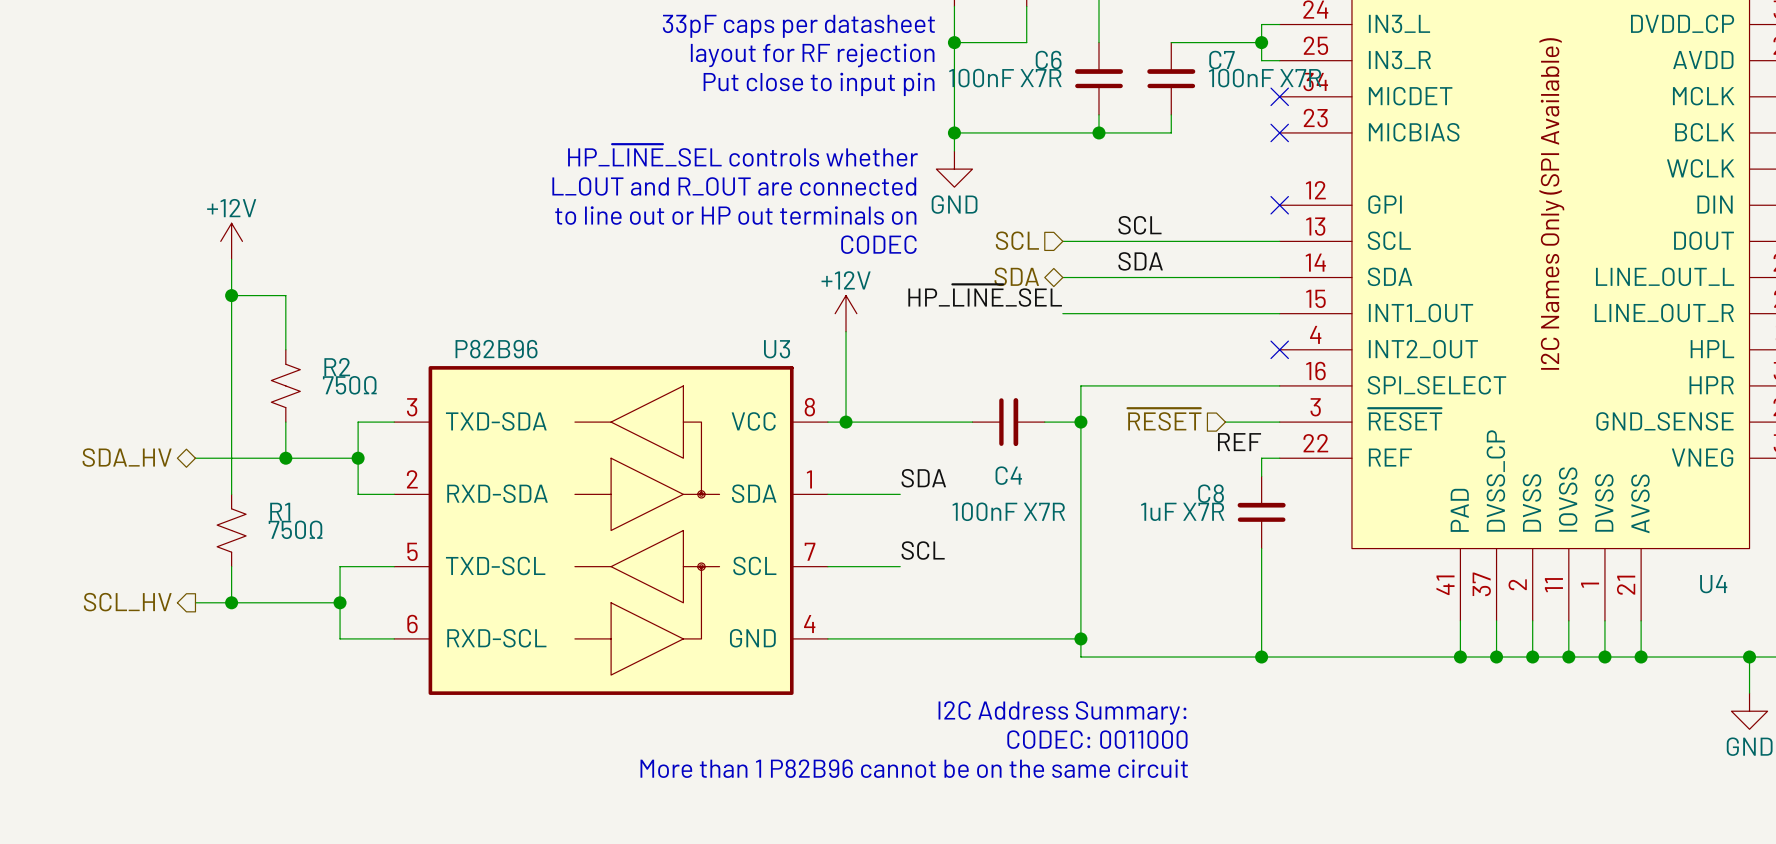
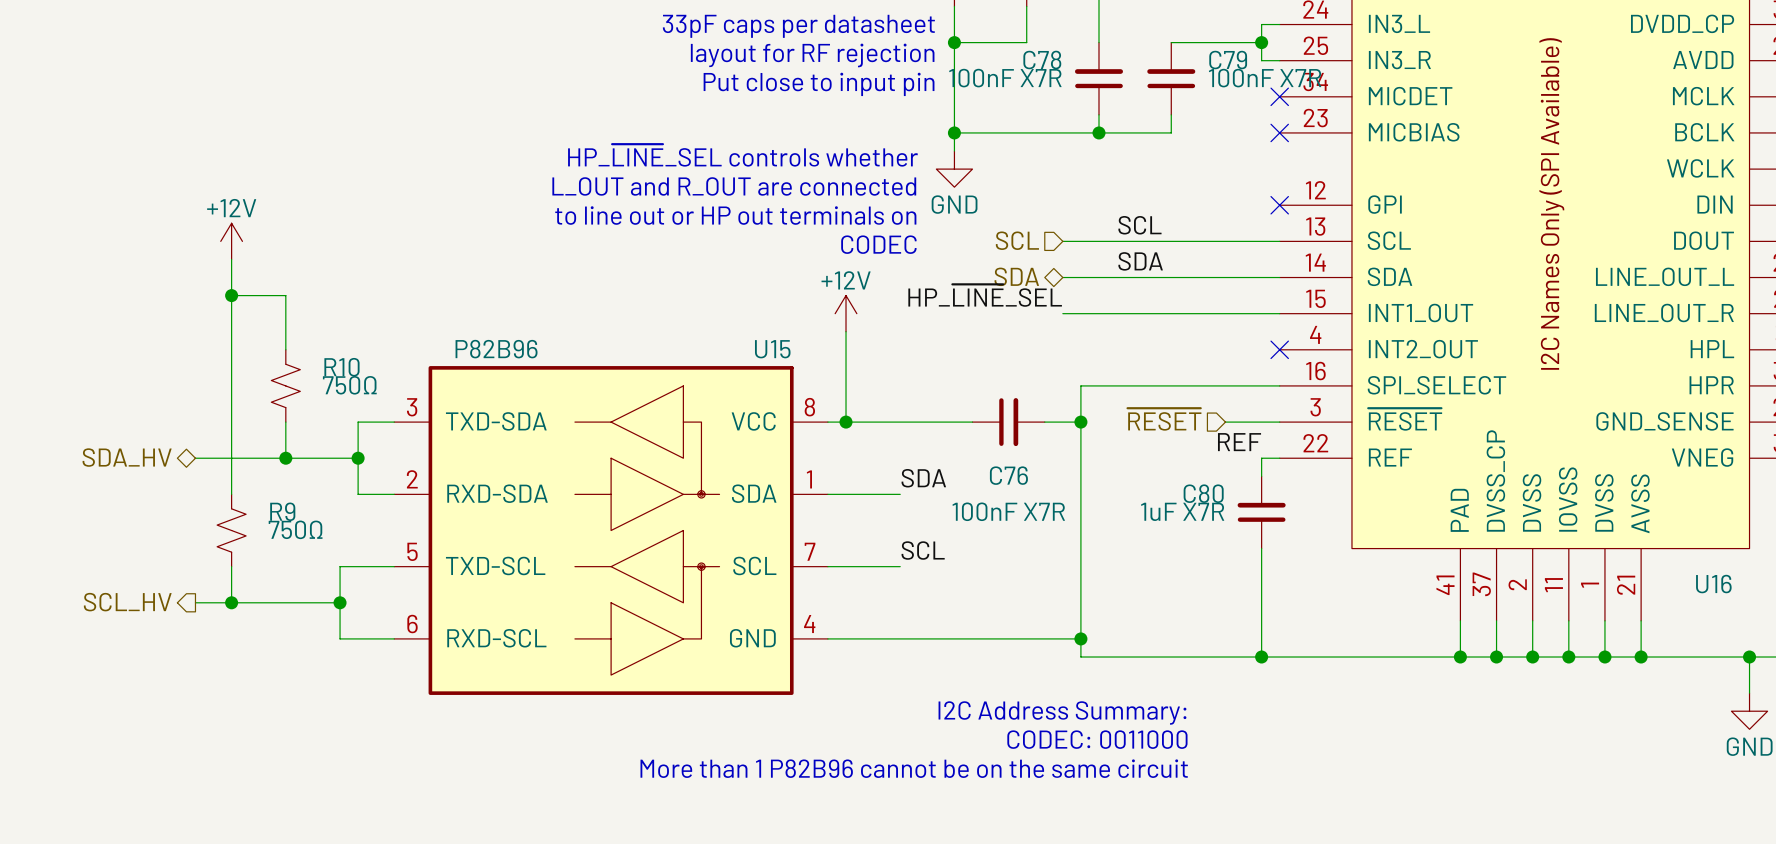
C6 name: C6 (1048, 60) -> C78 (1042, 59)
C7 name: C7 (1222, 60) -> C79 (1228, 60)
U3 name: U3 (777, 349) -> U15 (772, 349)
R2 name: R2 (337, 367) -> R10 (341, 367)
C4 name: C4 (1008, 475) -> C76 (1008, 475)
C8 name: C8 (1211, 493) -> C80 (1203, 493)
R1 name: R1 (280, 511) -> R9 (282, 511)
U4 name: U4 (1713, 584) -> U16 (1713, 584)

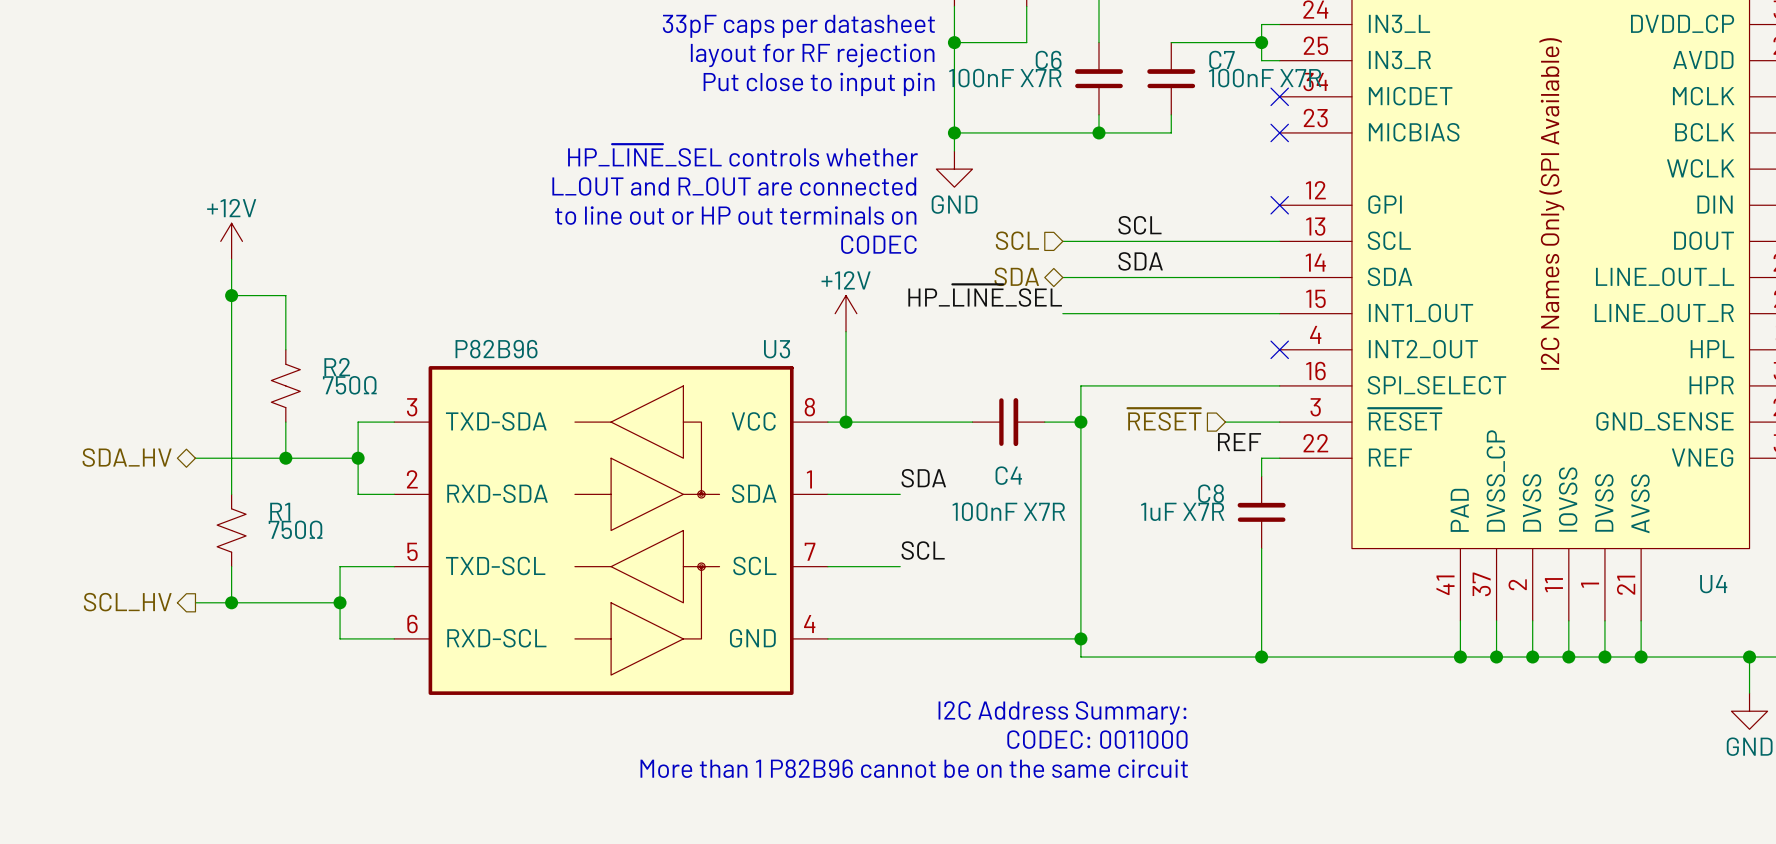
C78 name: C78 (1042, 59) -> C6 (1048, 60)
C79 name: C79 (1228, 60) -> C7 (1222, 60)
U15 name: U15 (772, 349) -> U3 (777, 349)
R10 name: R10 (341, 367) -> R2 (337, 367)
C76 name: C76 (1008, 475) -> C4 (1008, 475)
C80 name: C80 (1203, 493) -> C8 (1211, 493)
R9 name: R9 (282, 511) -> R1 (280, 511)
U16 name: U16 (1713, 584) -> U4 (1713, 584)

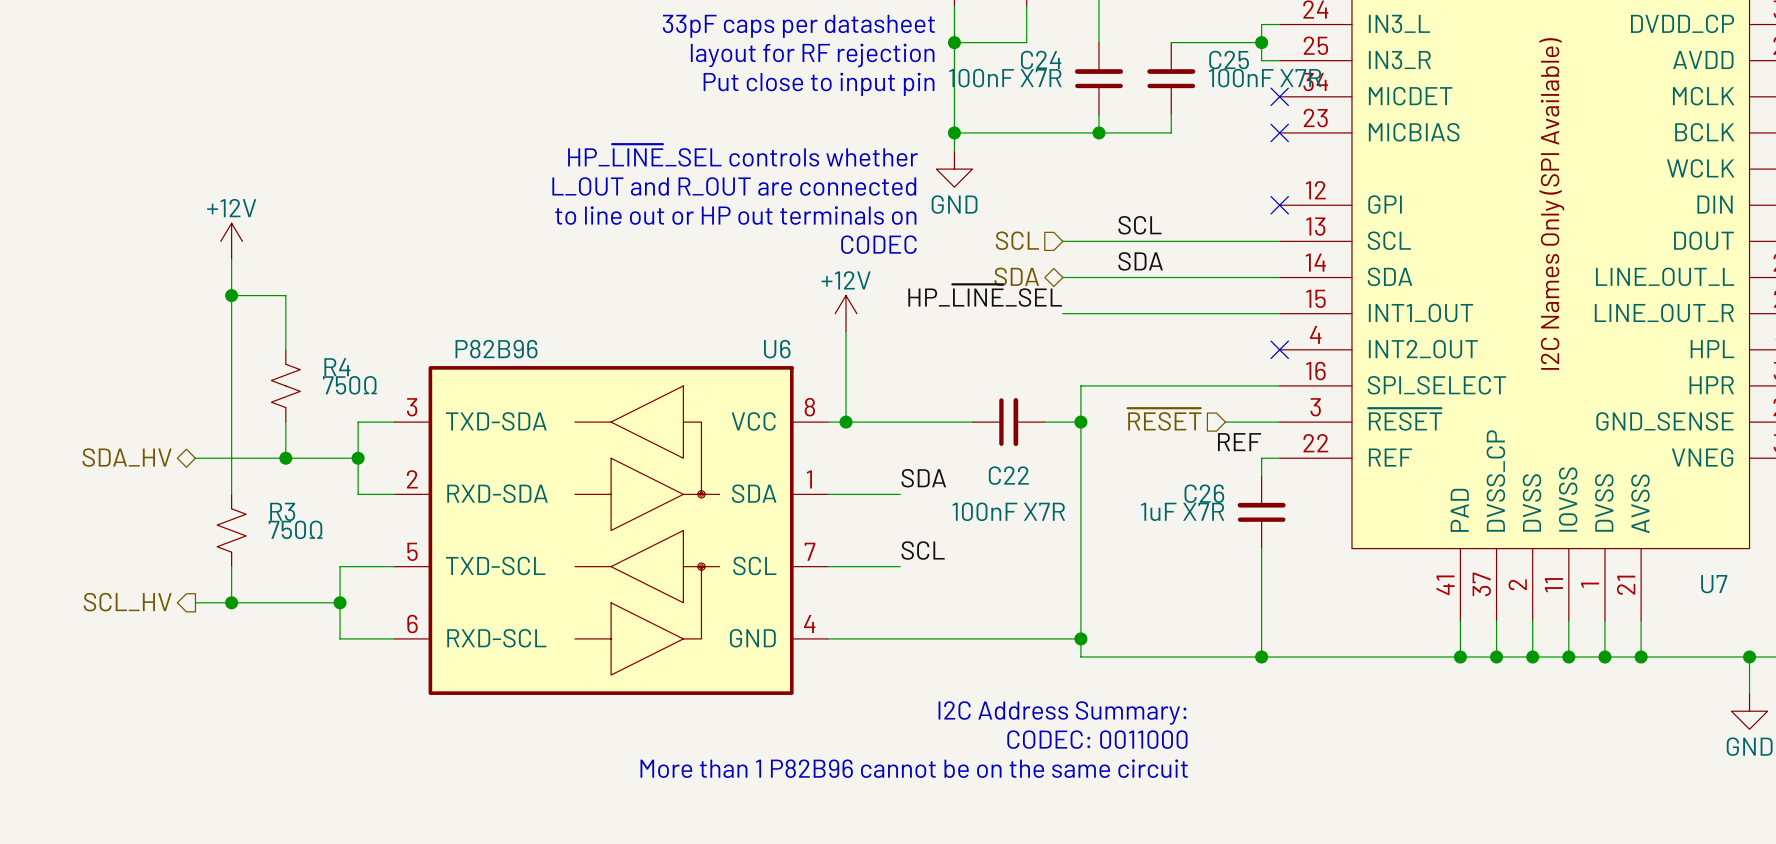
C6 name: C6 (1048, 60) -> C24 (1041, 60)
C7 name: C7 (1222, 60) -> C25 (1229, 60)
U3 name: U3 (777, 349) -> U6 (777, 349)
R2 name: R2 (337, 367) -> R4 (337, 367)
C4 name: C4 (1008, 475) -> C22 (1008, 475)
C8 name: C8 (1211, 493) -> C26 (1204, 493)
R1 name: R1 (280, 511) -> R3 (282, 511)
U4 name: U4 (1713, 584) -> U7 (1714, 584)

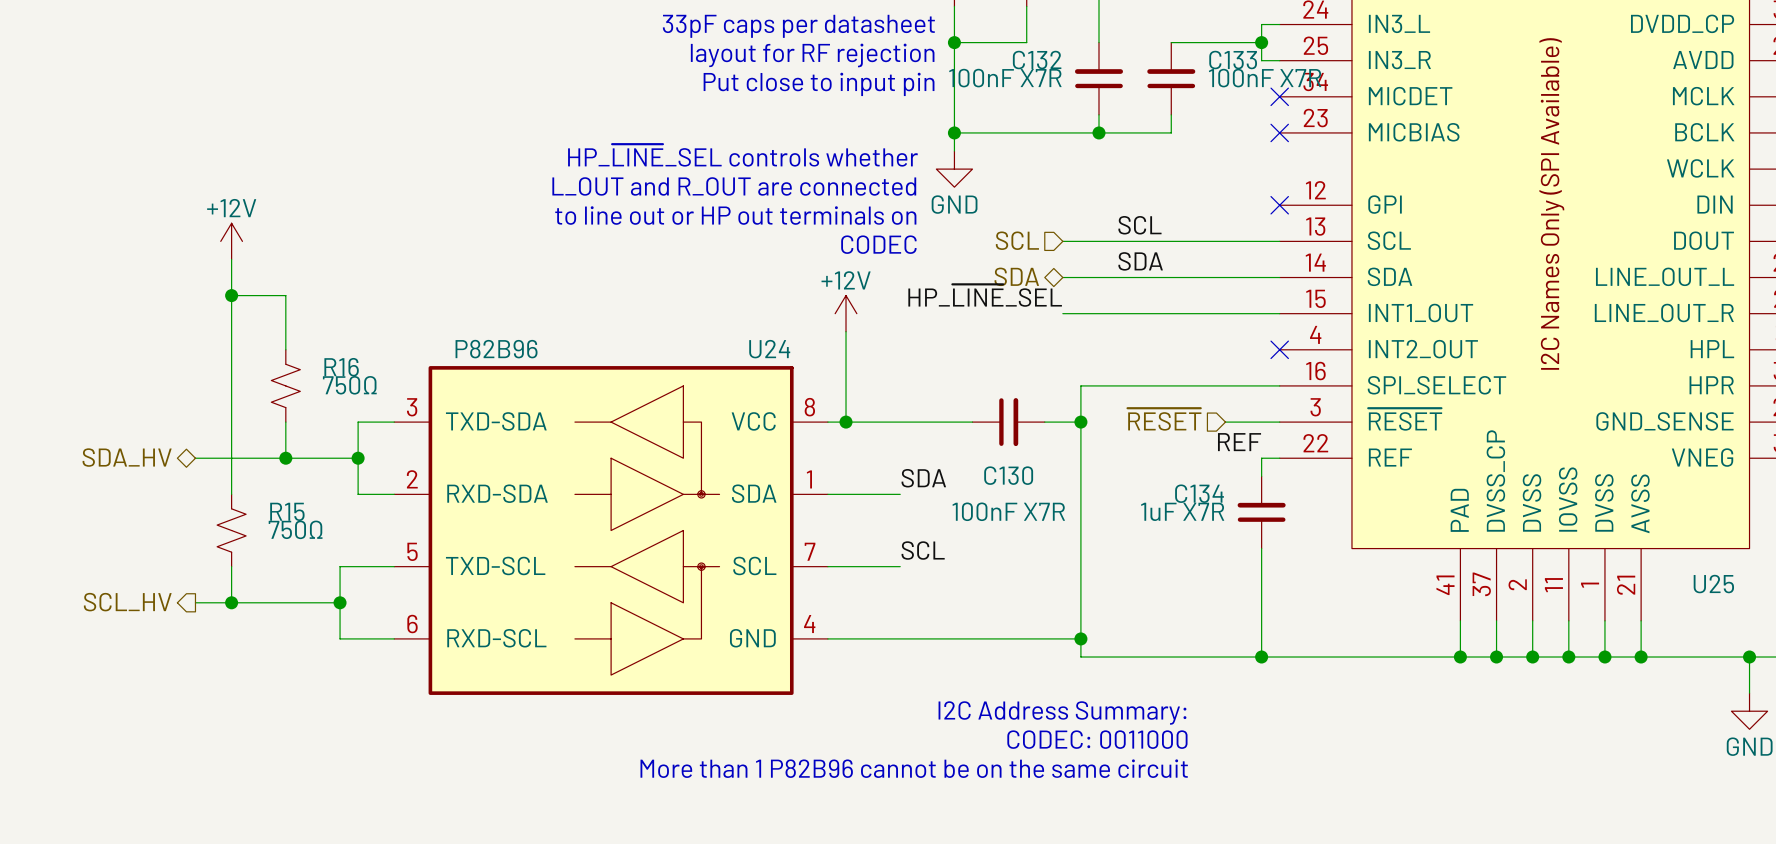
C24 name: C24 (1041, 60) -> C132 (1037, 60)
C25 name: C25 (1229, 60) -> C133 (1233, 60)
U6 name: U6 (777, 349) -> U24 (769, 349)
R4 name: R4 (337, 367) -> R16 (341, 367)
C22 name: C22 (1008, 475) -> C130 (1008, 475)
C26 name: C26 (1204, 493) -> C134 (1199, 493)
R3 name: R3 (282, 511) -> R15 (287, 511)
U7 name: U7 (1714, 584) -> U25 (1713, 584)

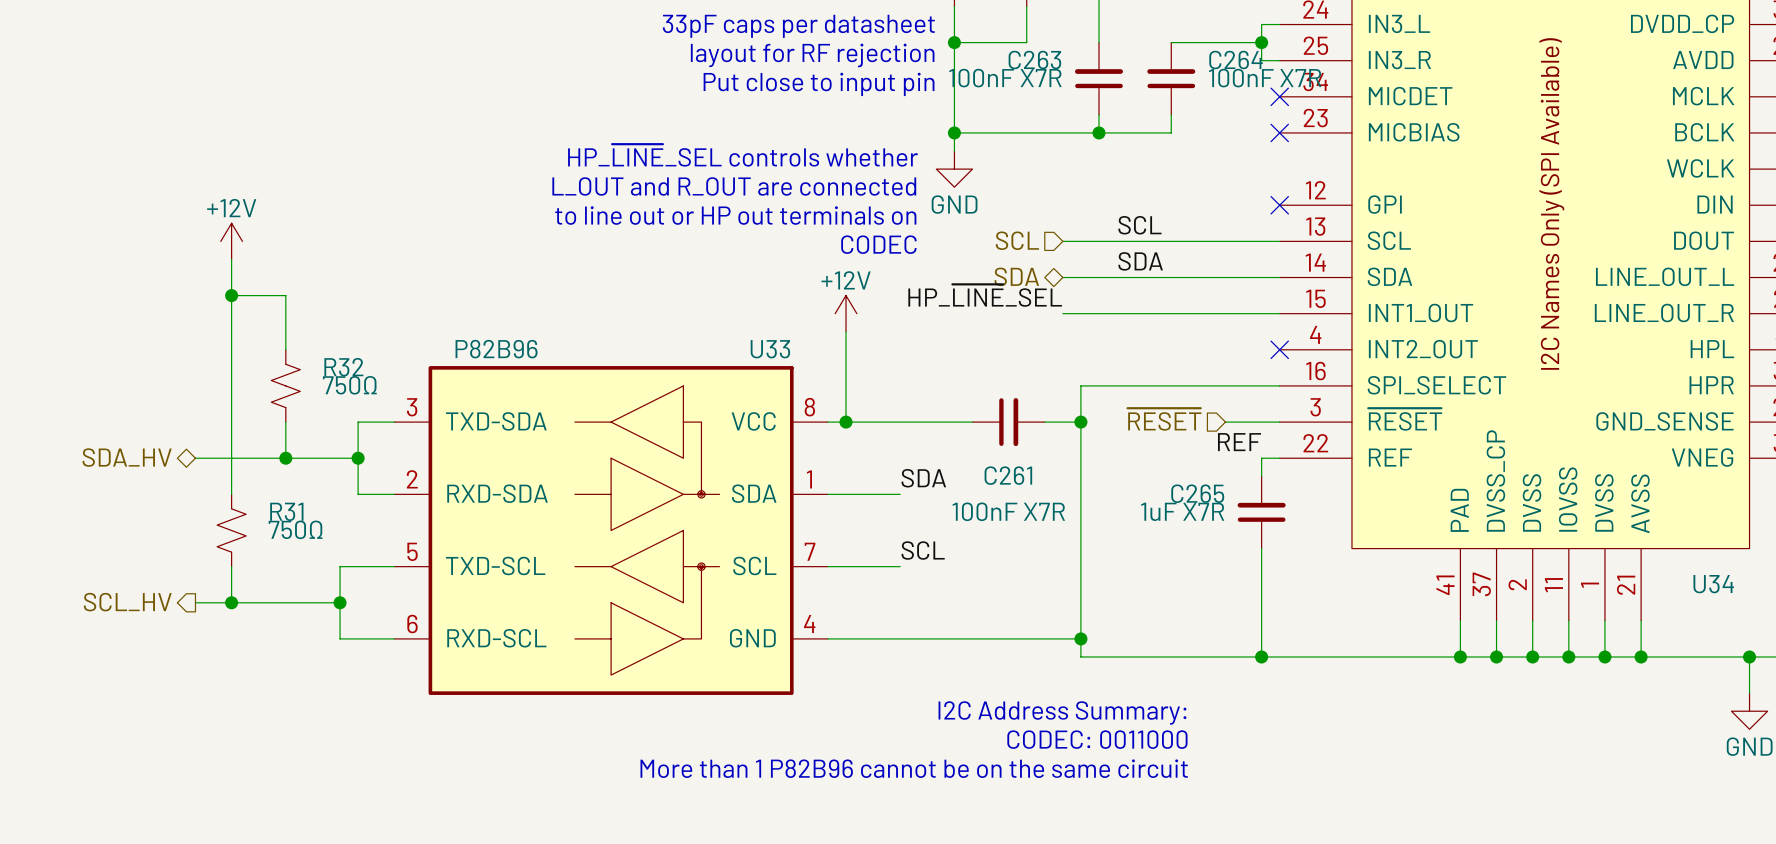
C132 name: C132 (1037, 60) -> C263 (1034, 60)
C133 name: C133 (1233, 60) -> C264 (1236, 60)
U24 name: U24 (769, 349) -> U33 (770, 349)
R16 name: R16 (341, 367) -> R32 (343, 367)
C130 name: C130 (1008, 475) -> C261 (1008, 475)
C134 name: C134 (1199, 493) -> C265 (1197, 493)
R15 name: R15 (287, 511) -> R31 (286, 511)
U25 name: U25 (1713, 584) -> U34 (1713, 584)

